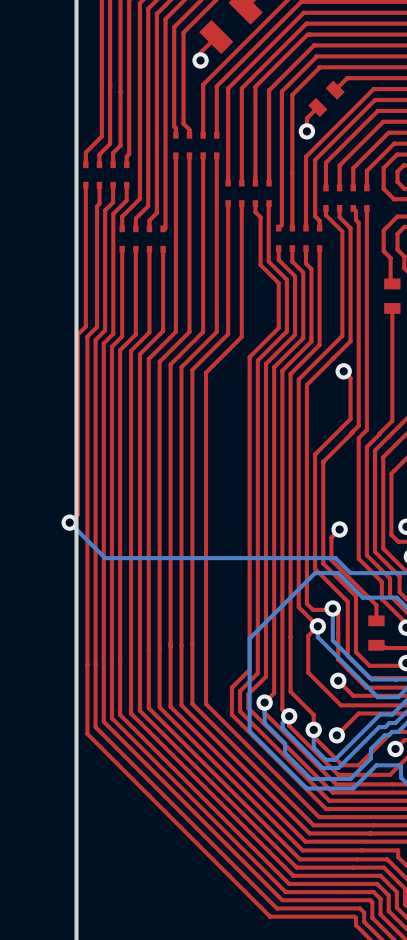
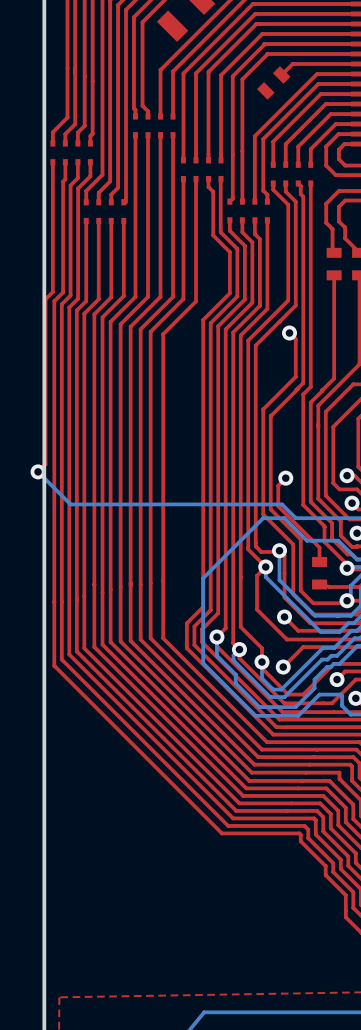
top track: (216, 36) (200, 52) (200, 60) -> none
via: (200, 60) -> none
top track: (317, 107) (306, 118) (306, 131) -> none
via: (306, 131) -> none

